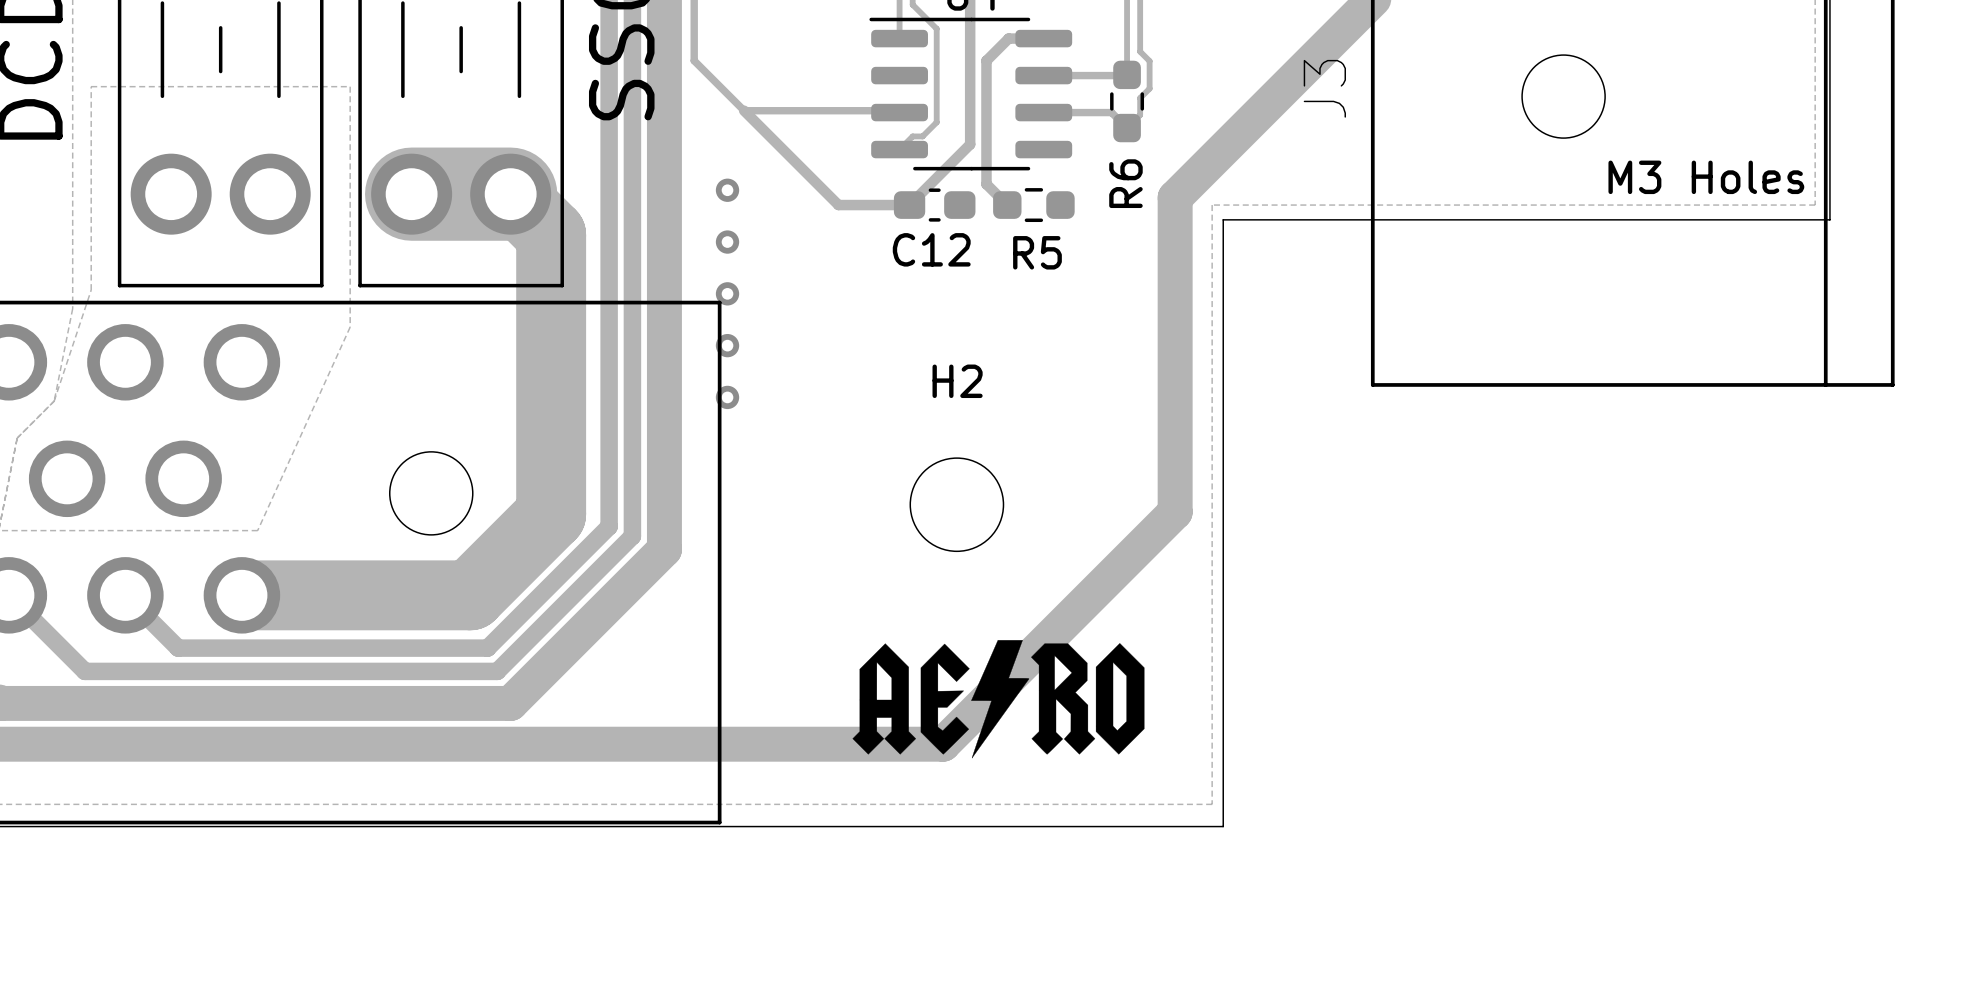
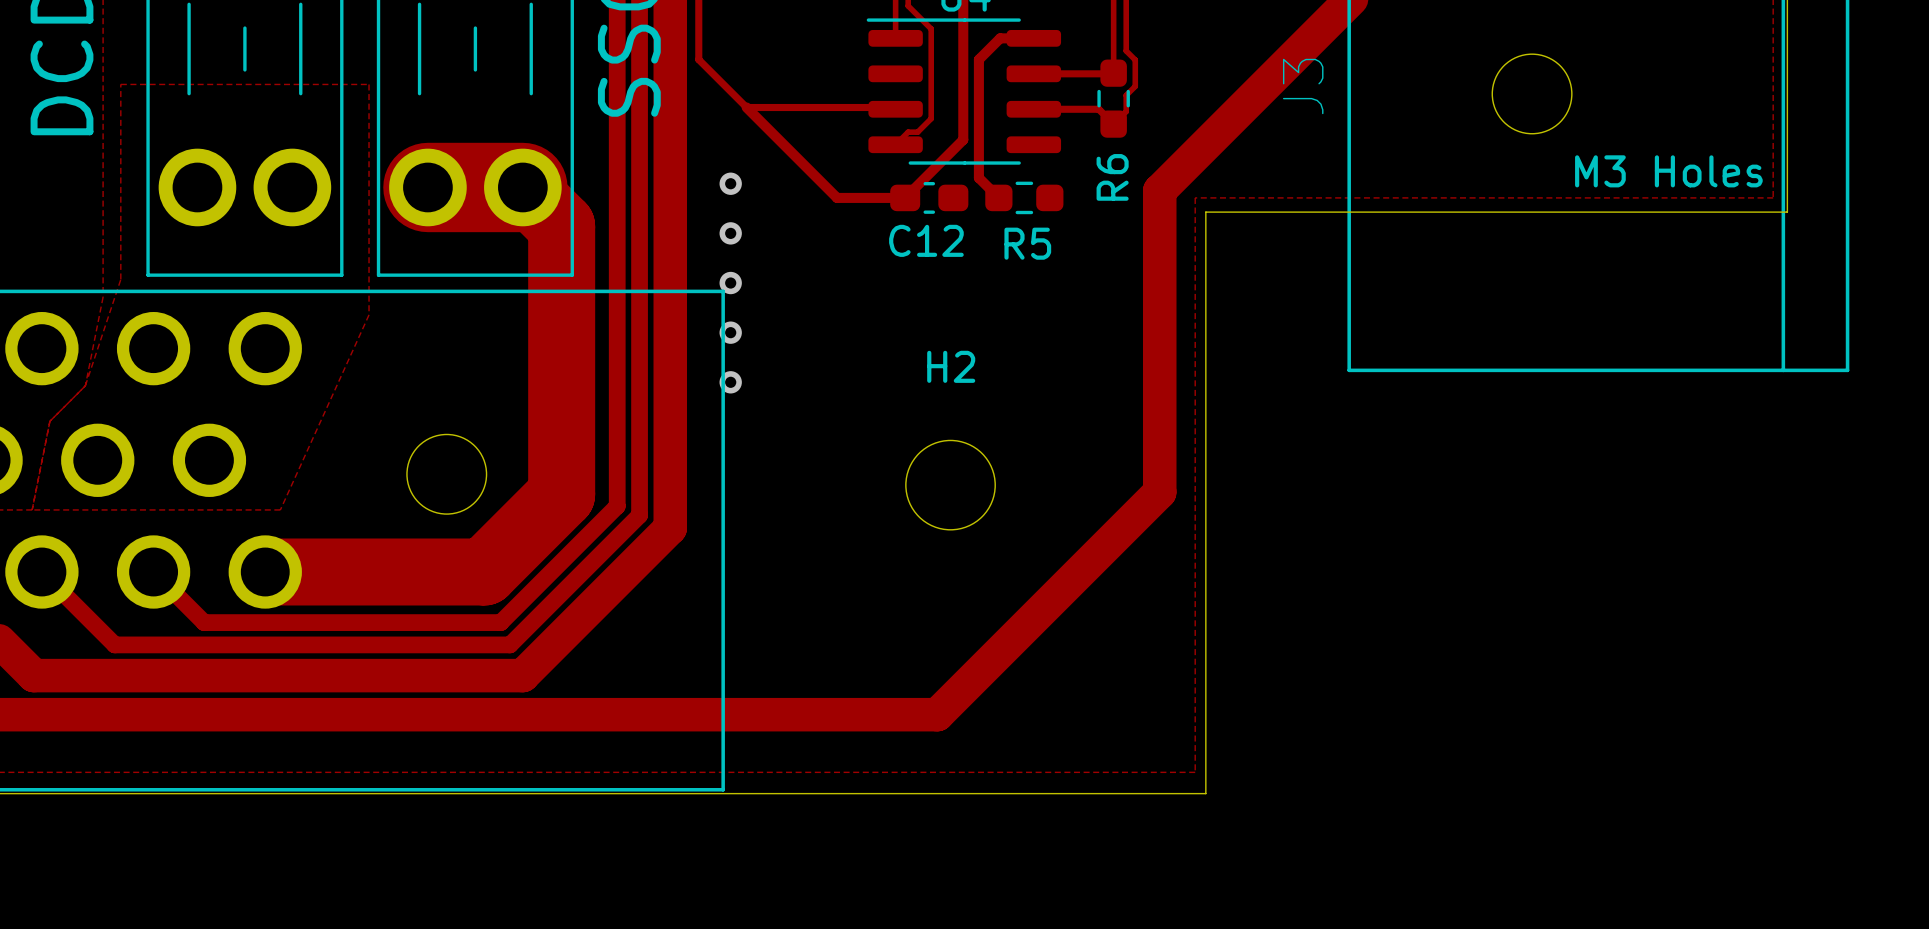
drawing: [852, 640, 1145, 759] -> none

